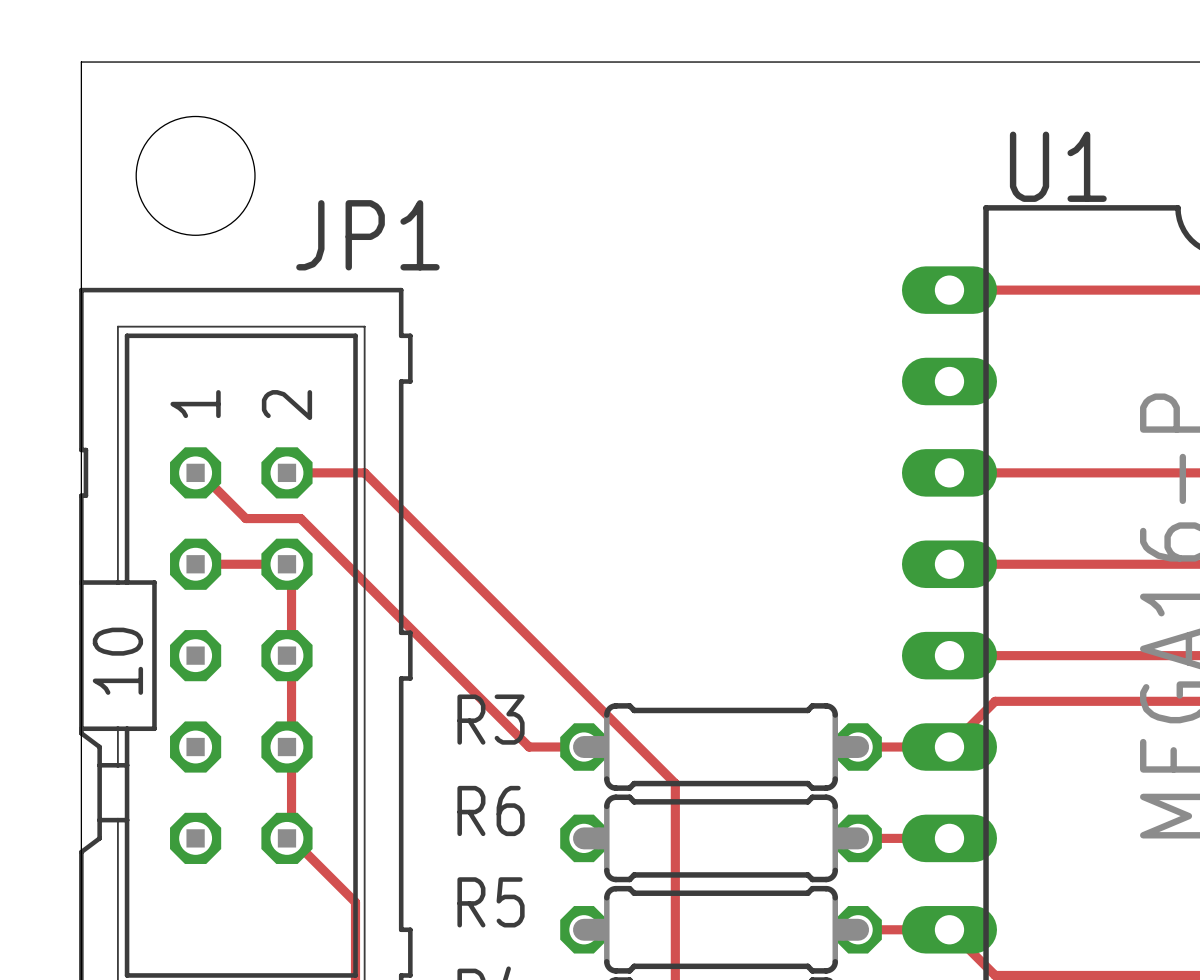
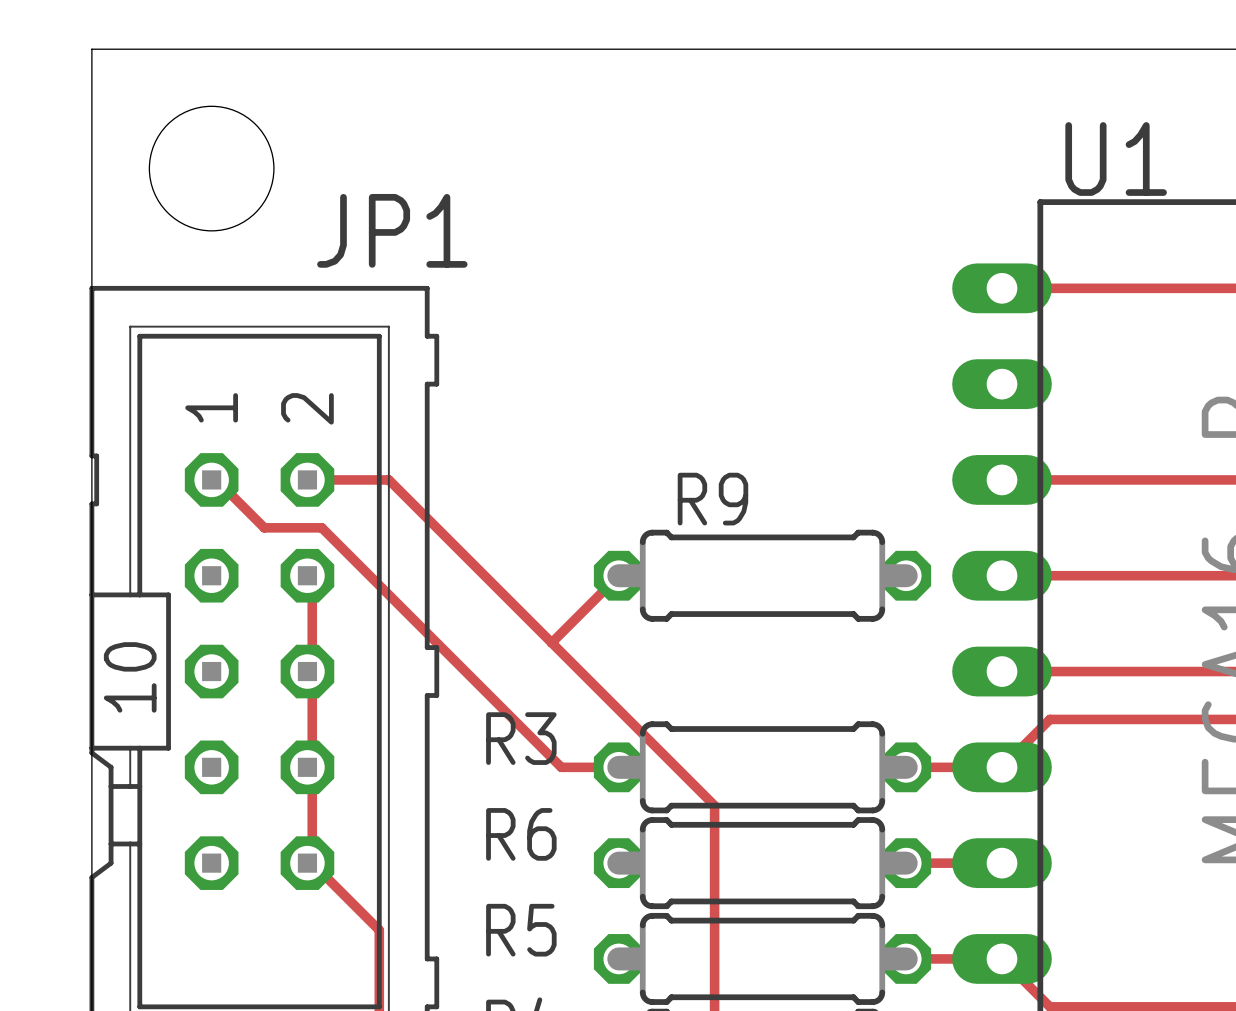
track: (195, 564) (286, 564) -> none
track: none -> (618, 575) (551, 642)
R9: none -> (762, 575)

